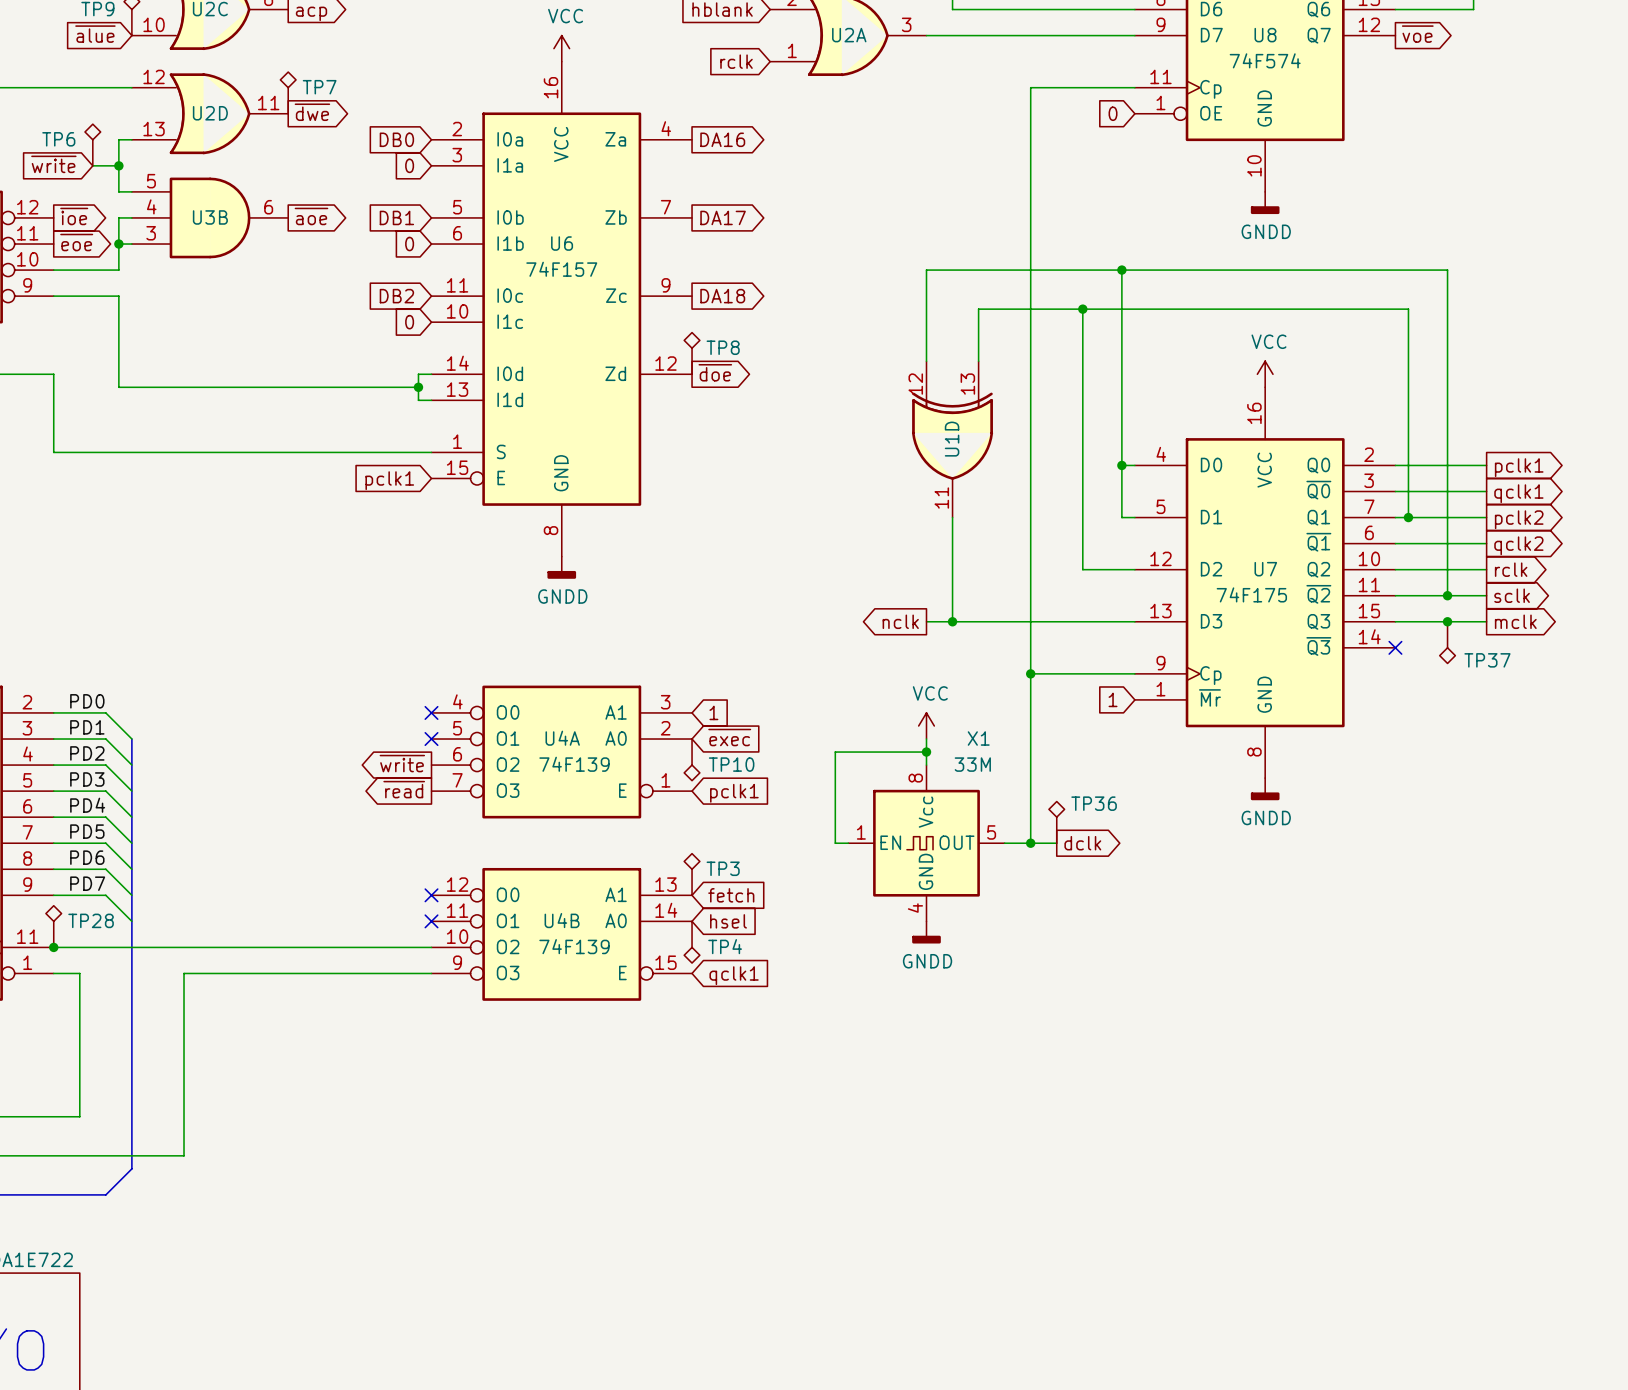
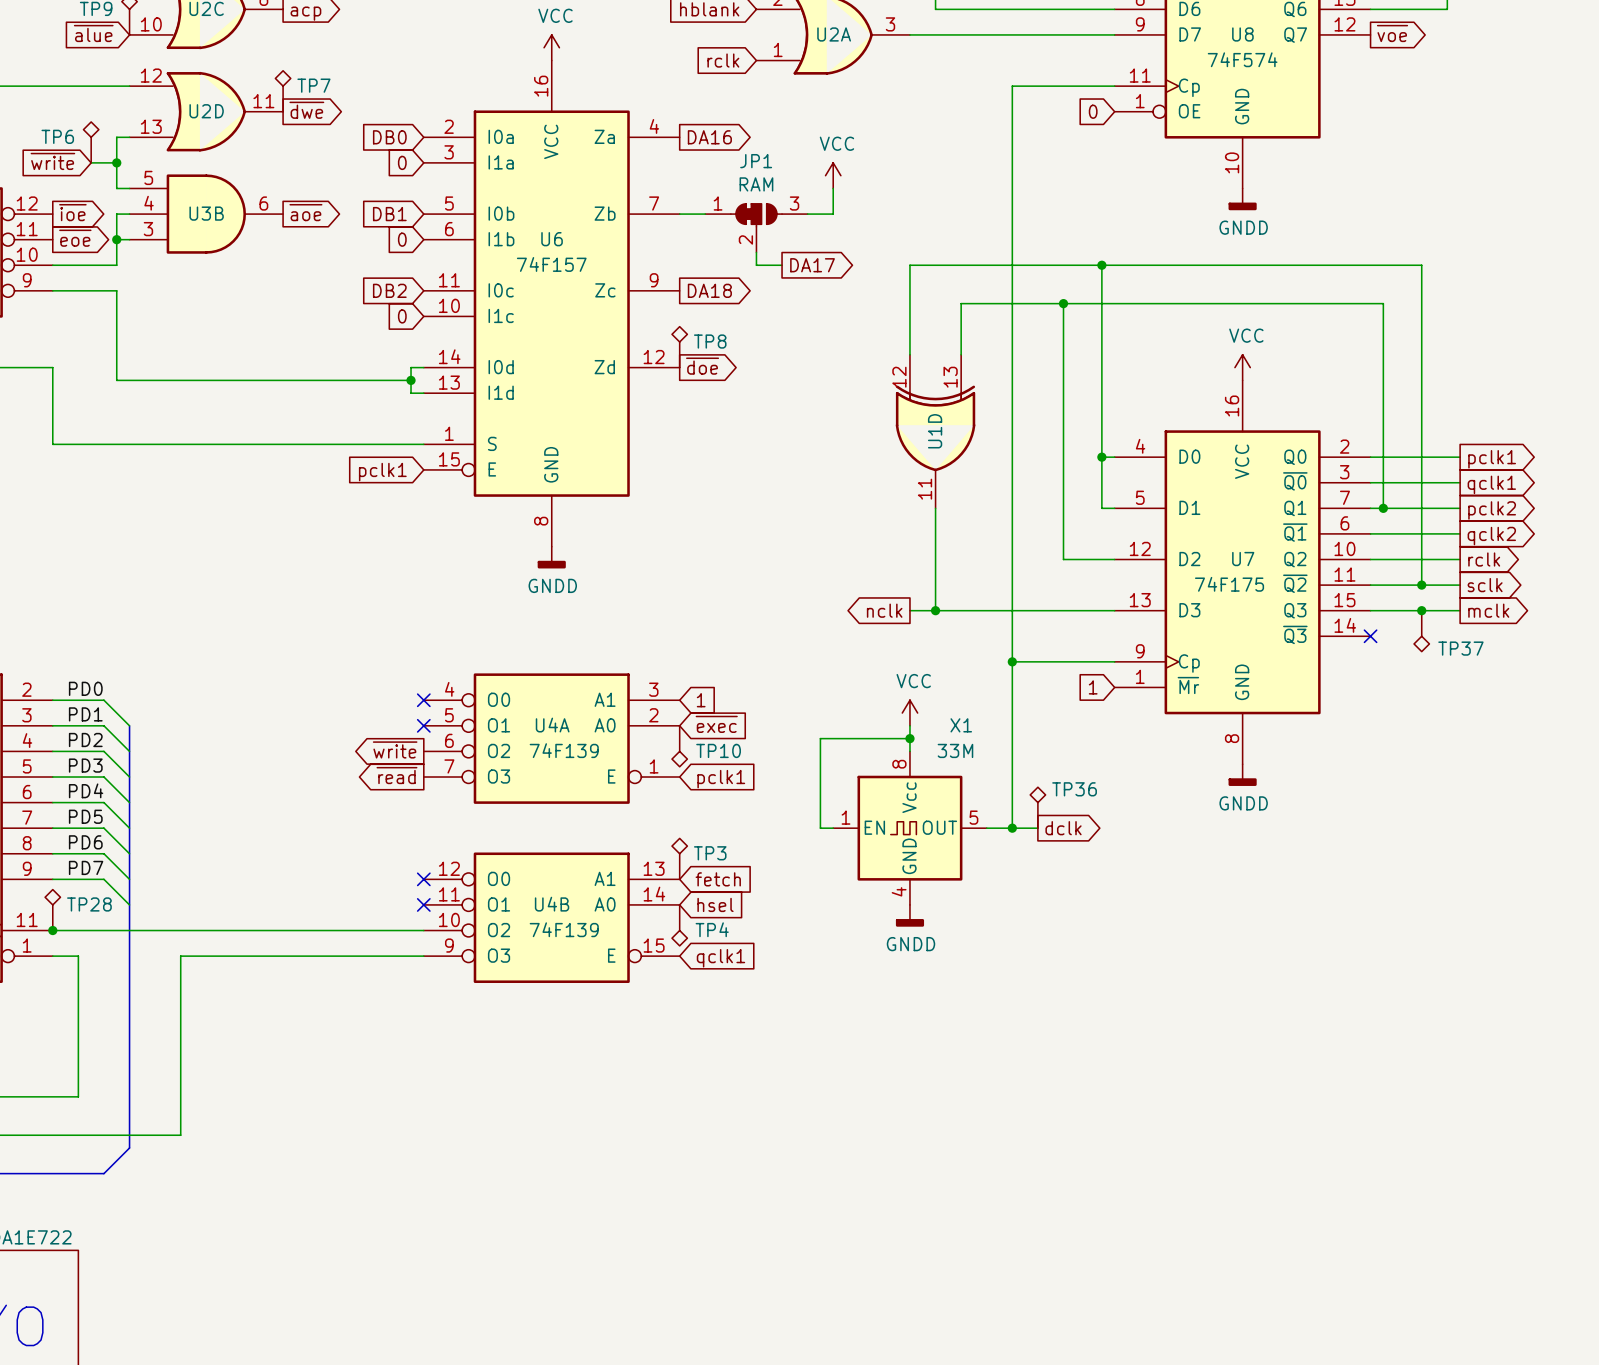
power symbol: none -> VCC (833, 175)
wire: none -> (833, 188) (833, 214) (807, 214)
wire: none -> (679, 214) (705, 214)
global label position: DA17 (723, 217) -> DA17 (812, 265)
JP1: none -> RAM (756, 228)
wire: none -> (756, 252) (756, 265) (782, 265)

